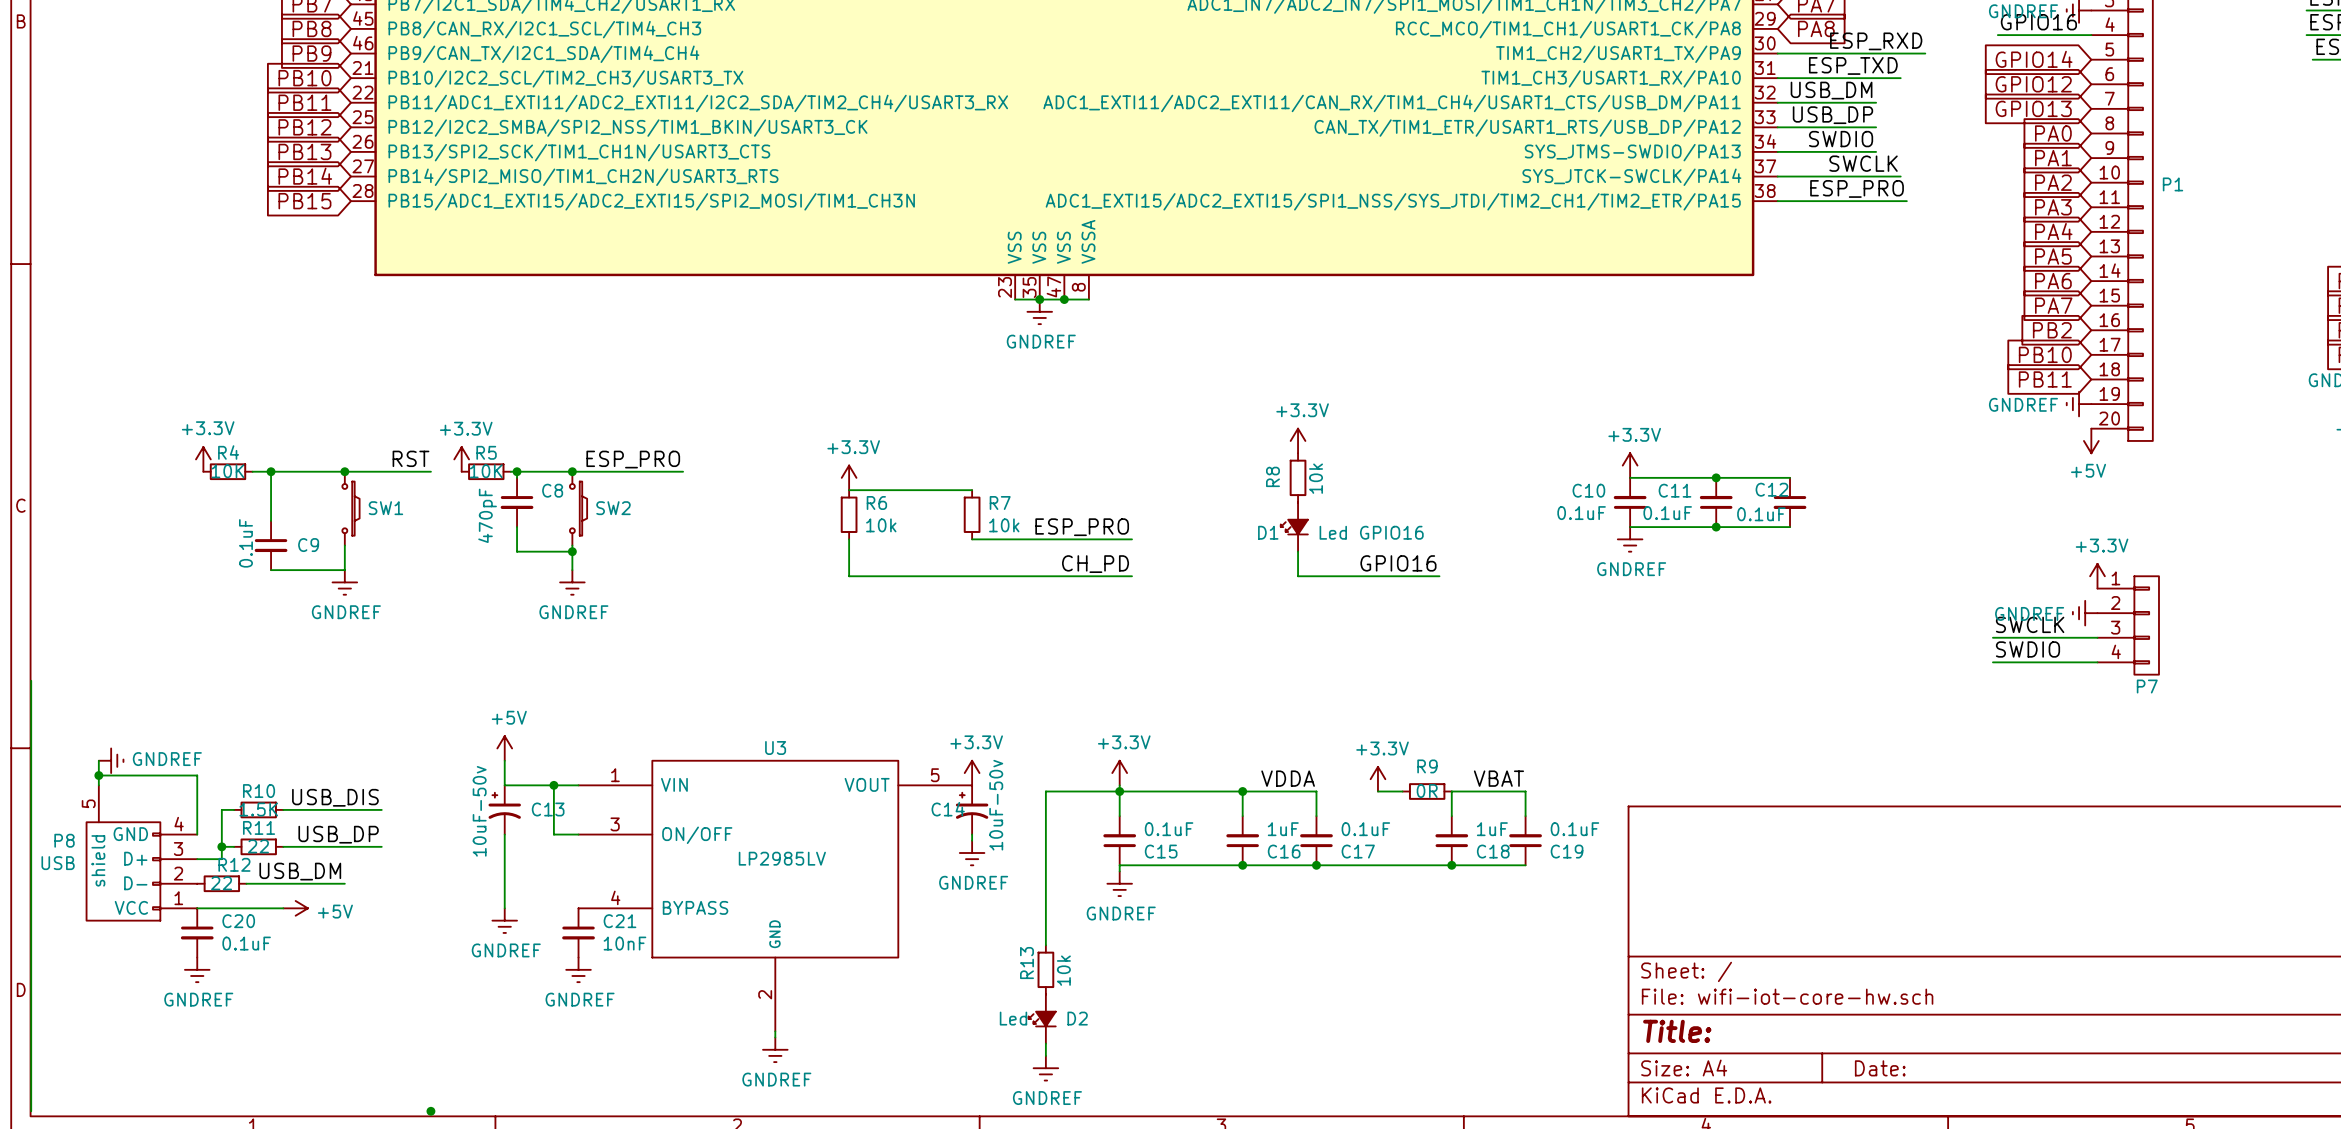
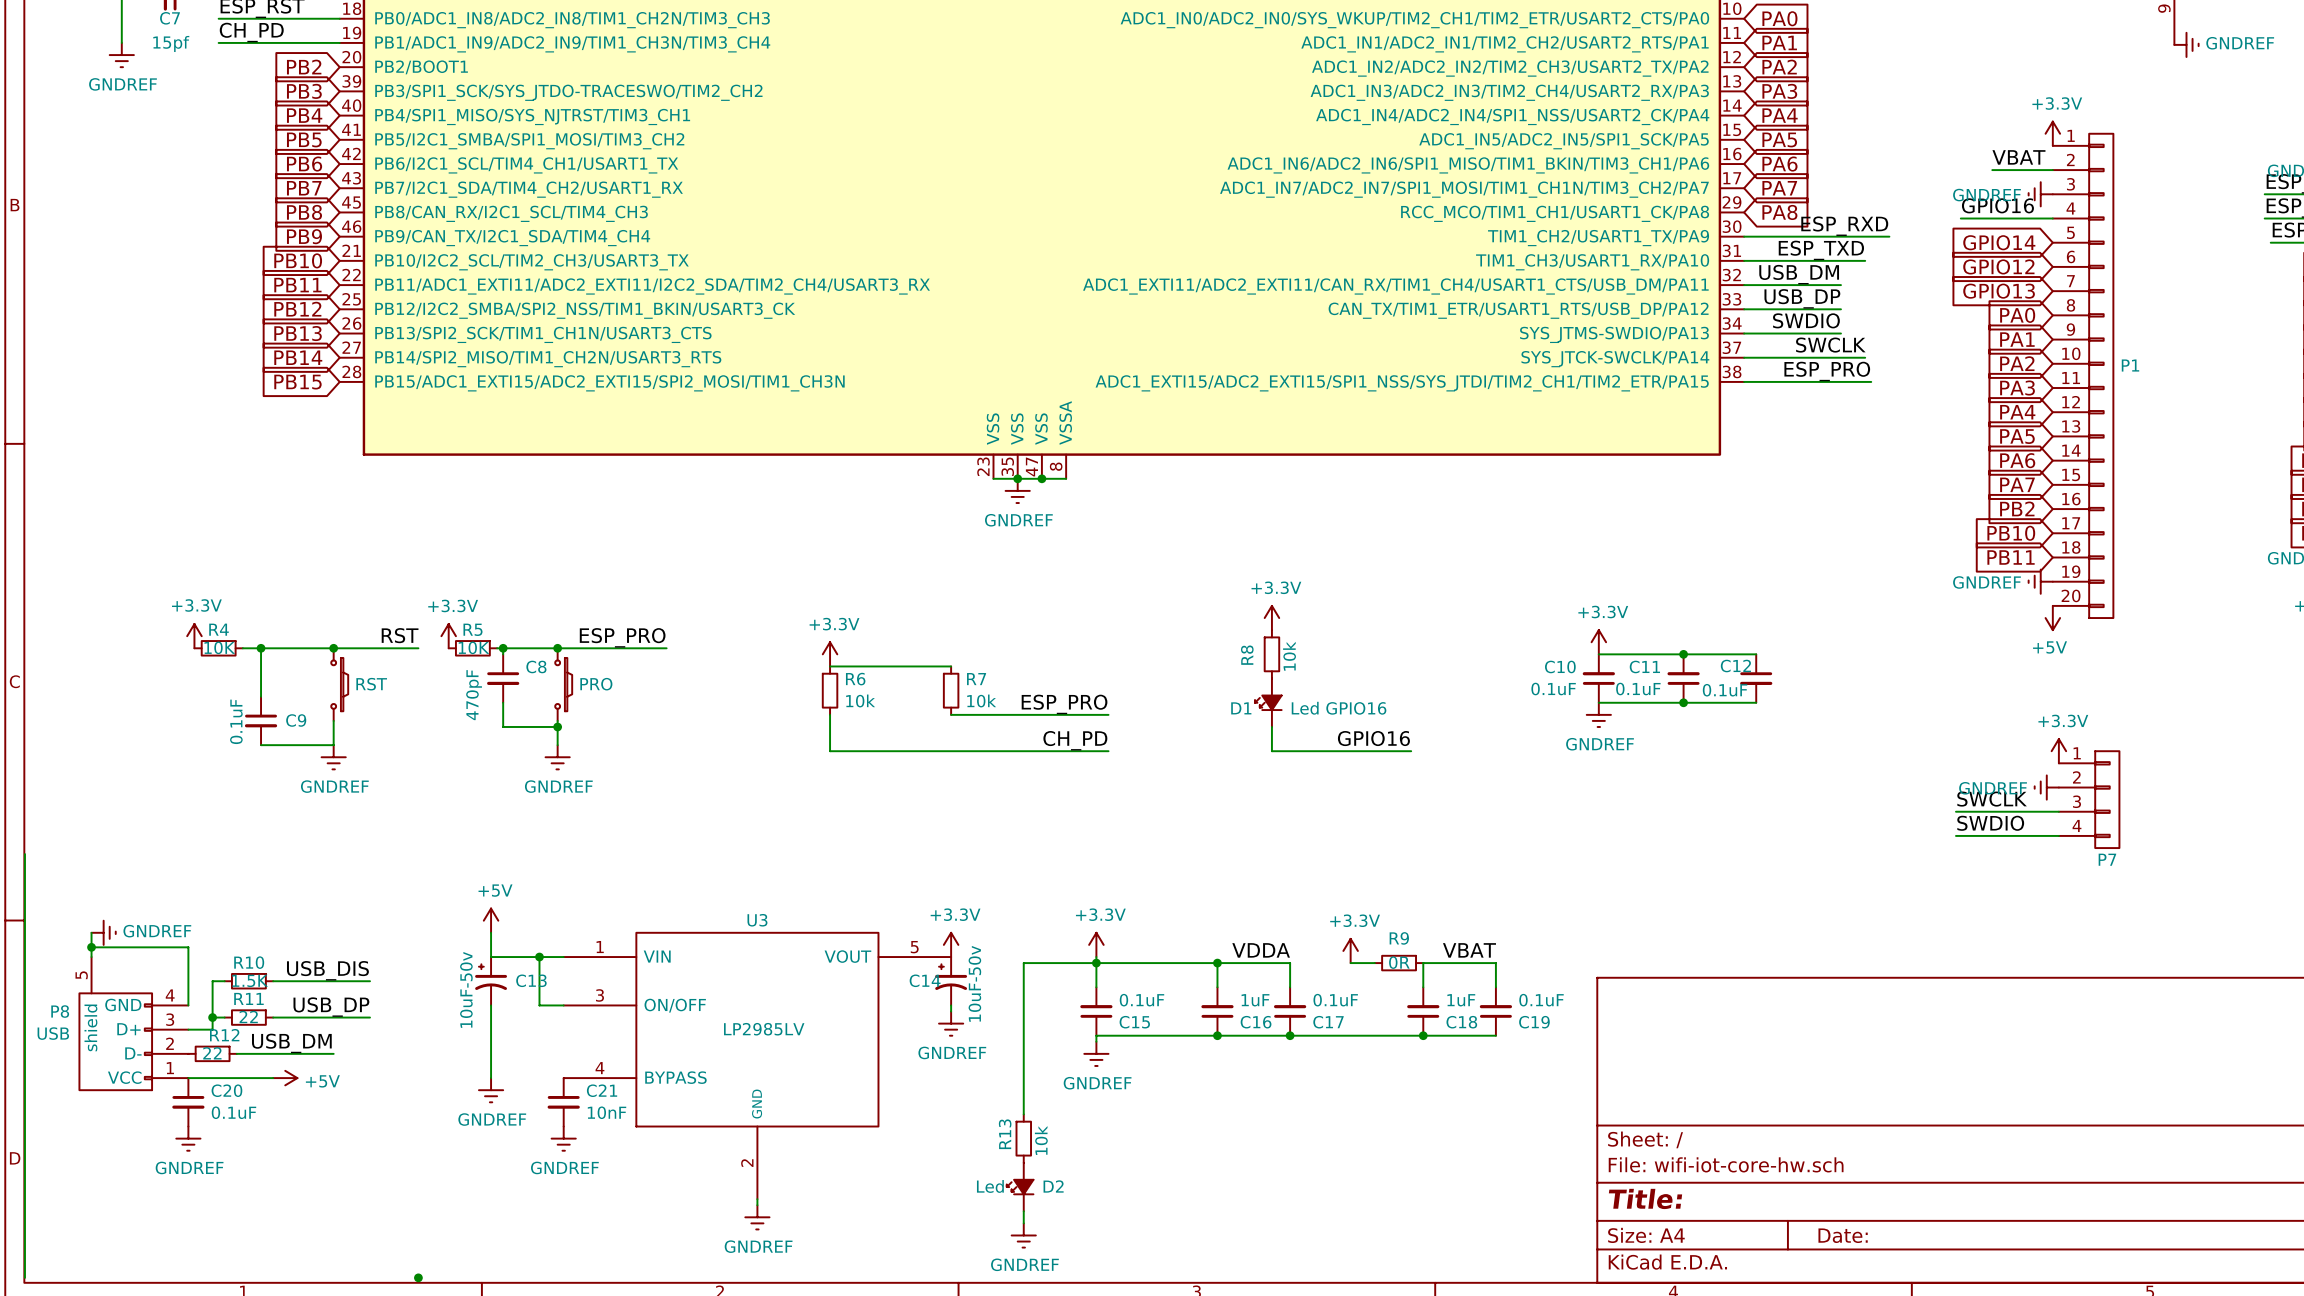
SW1 name: SW1 (385, 508) -> RST (371, 684)
SW2 name: SW2 (613, 508) -> PRO (596, 684)

